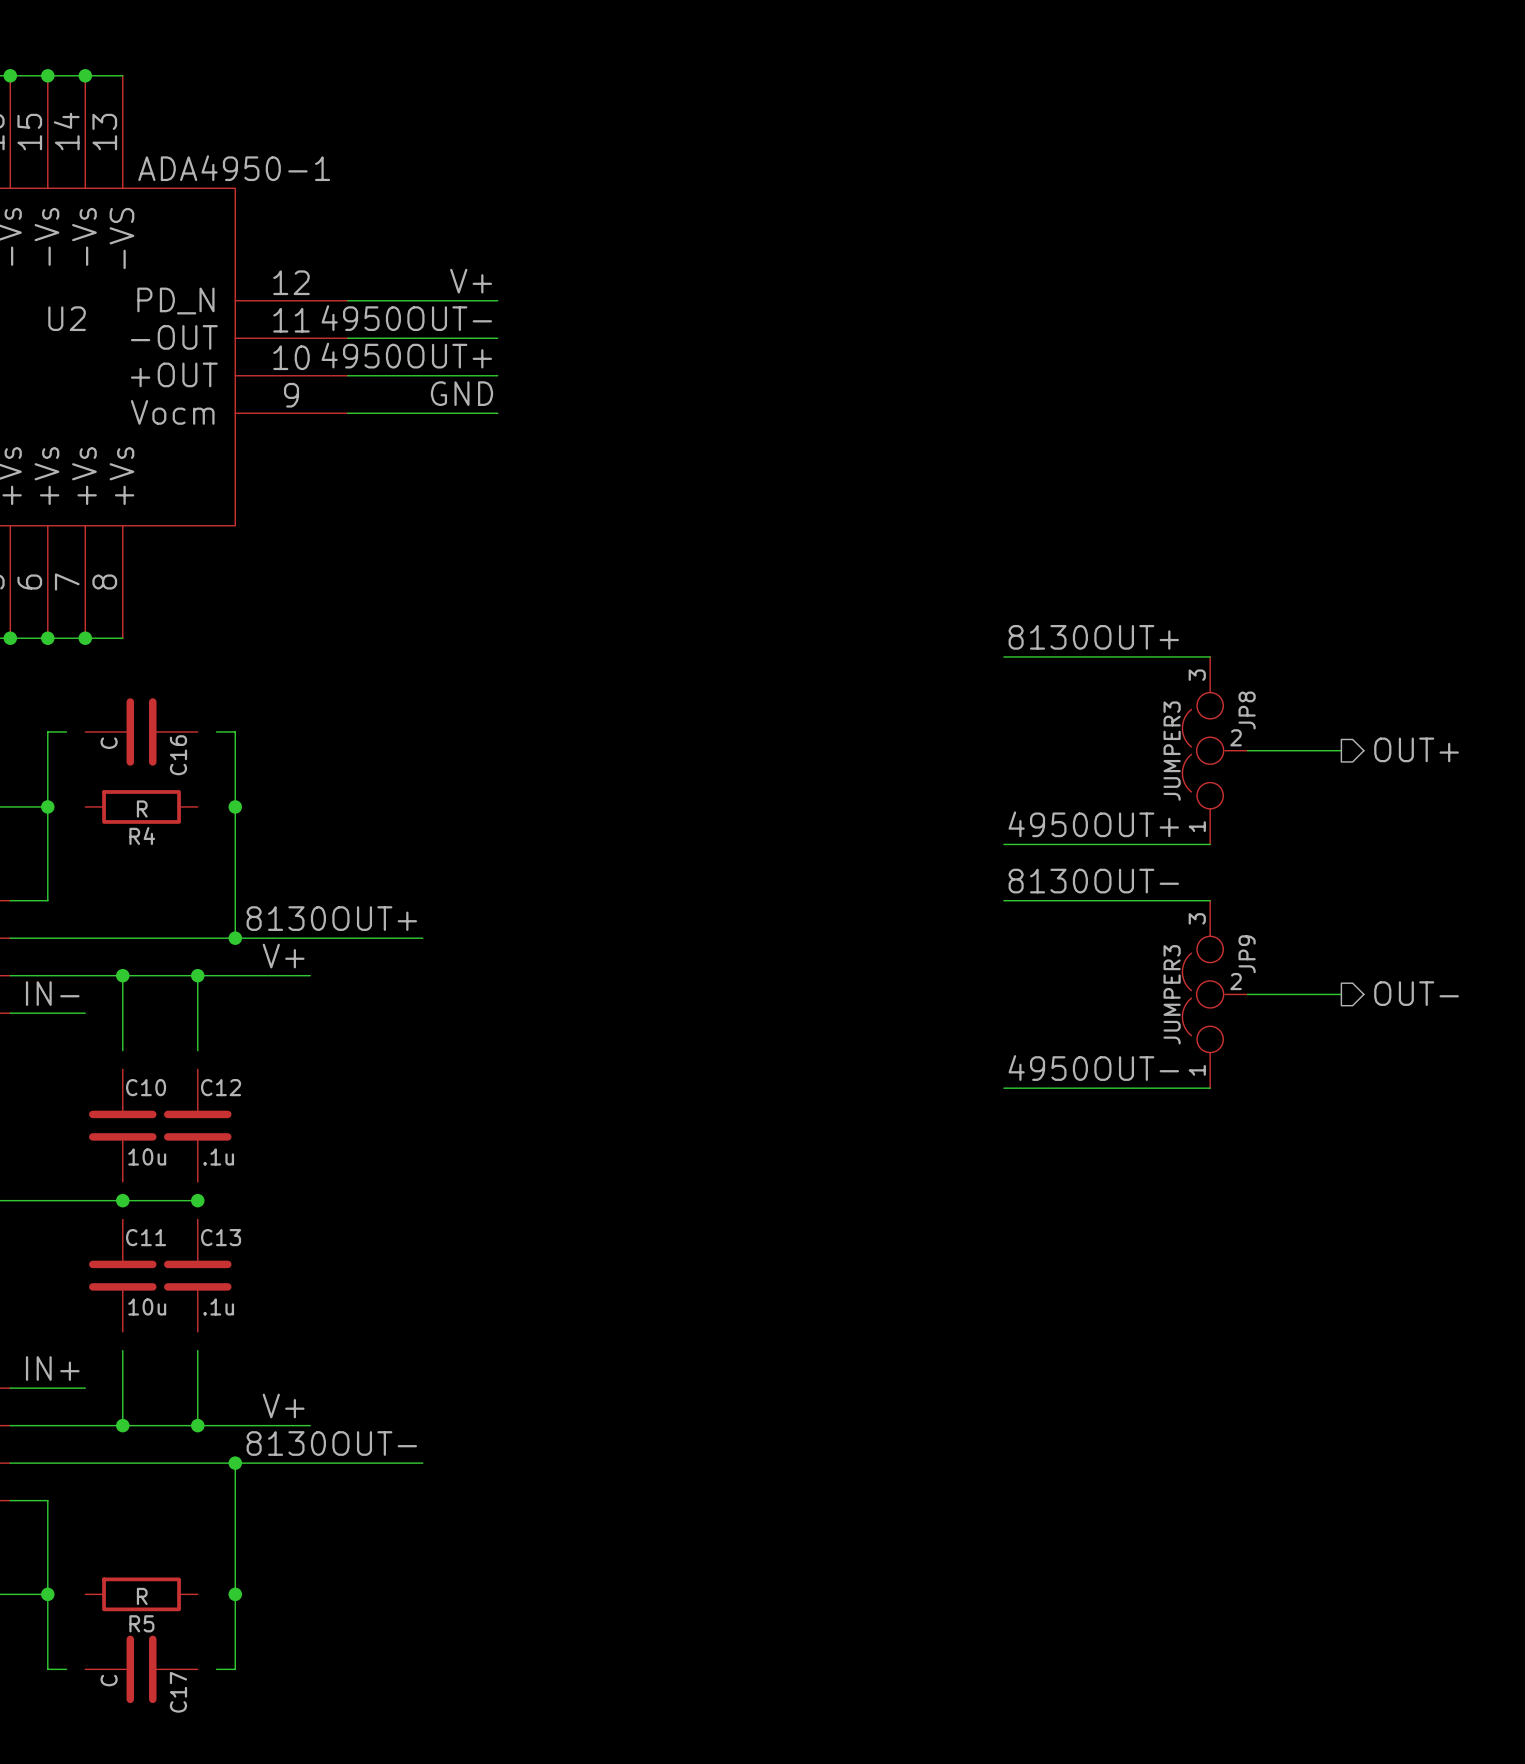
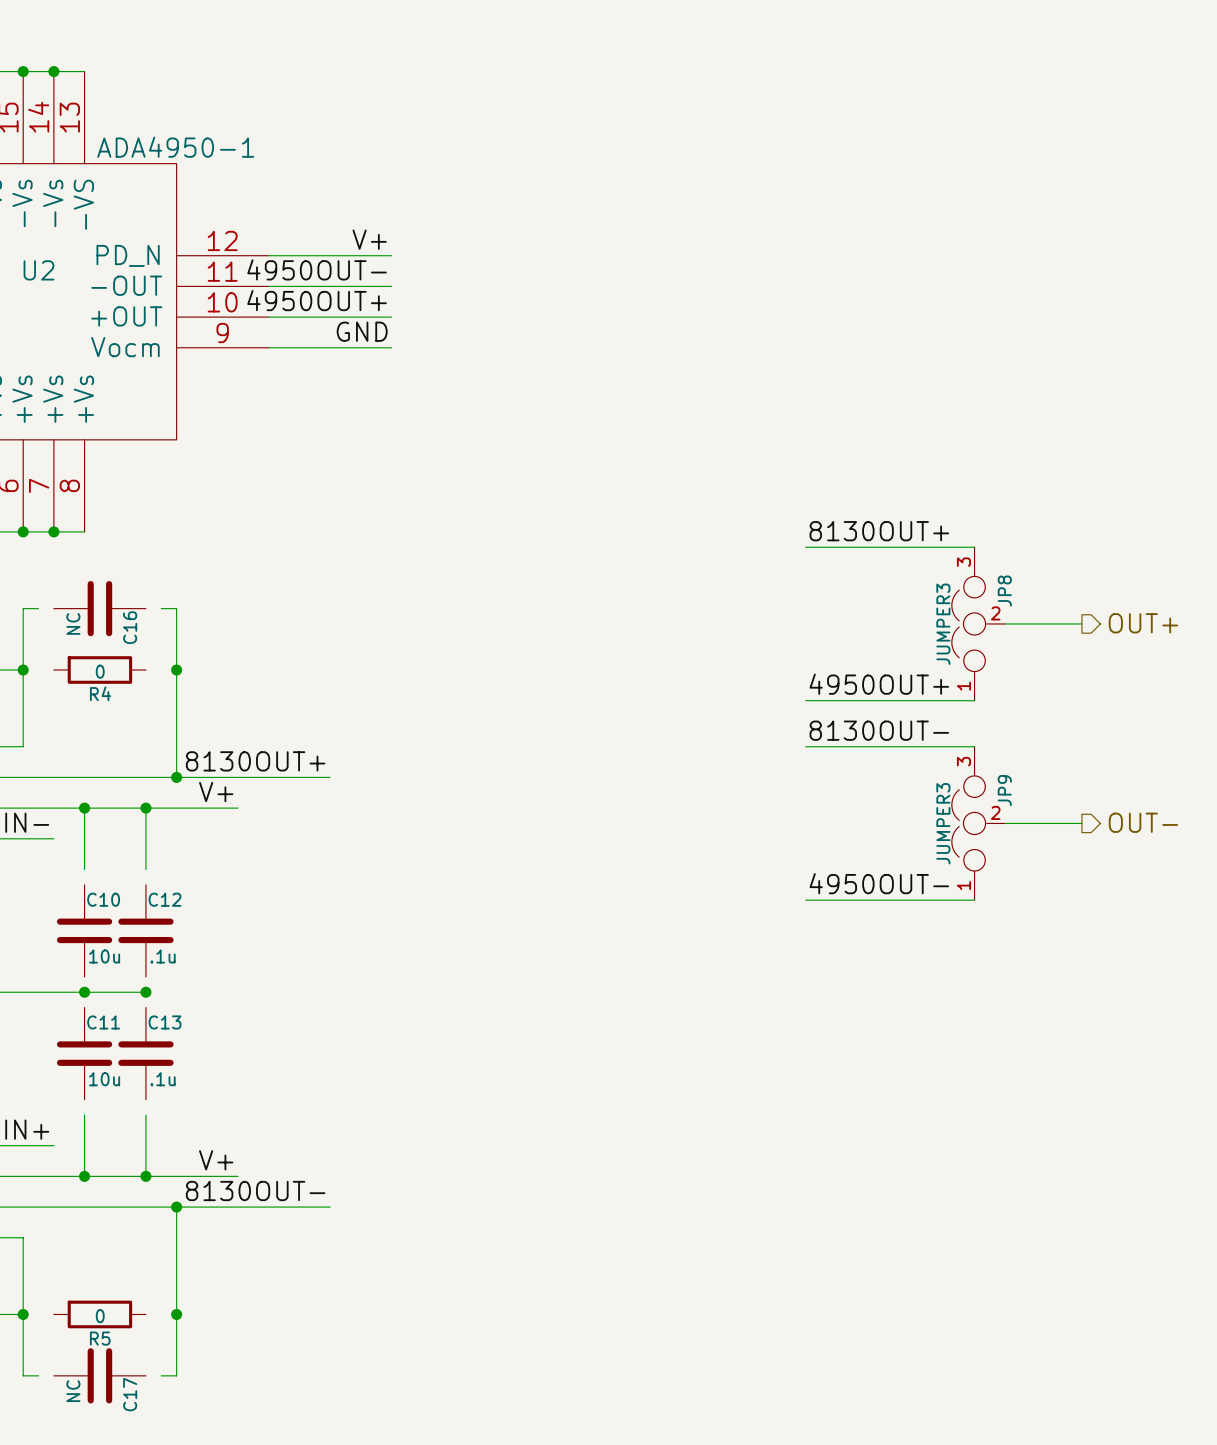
C16 value: C (109, 743) -> NC (73, 623)
R4 value: R (142, 809) -> 0 (100, 671)
R5 value: R (142, 1596) -> 0 (100, 1316)
C17 value: C (109, 1680) -> NC (73, 1391)

